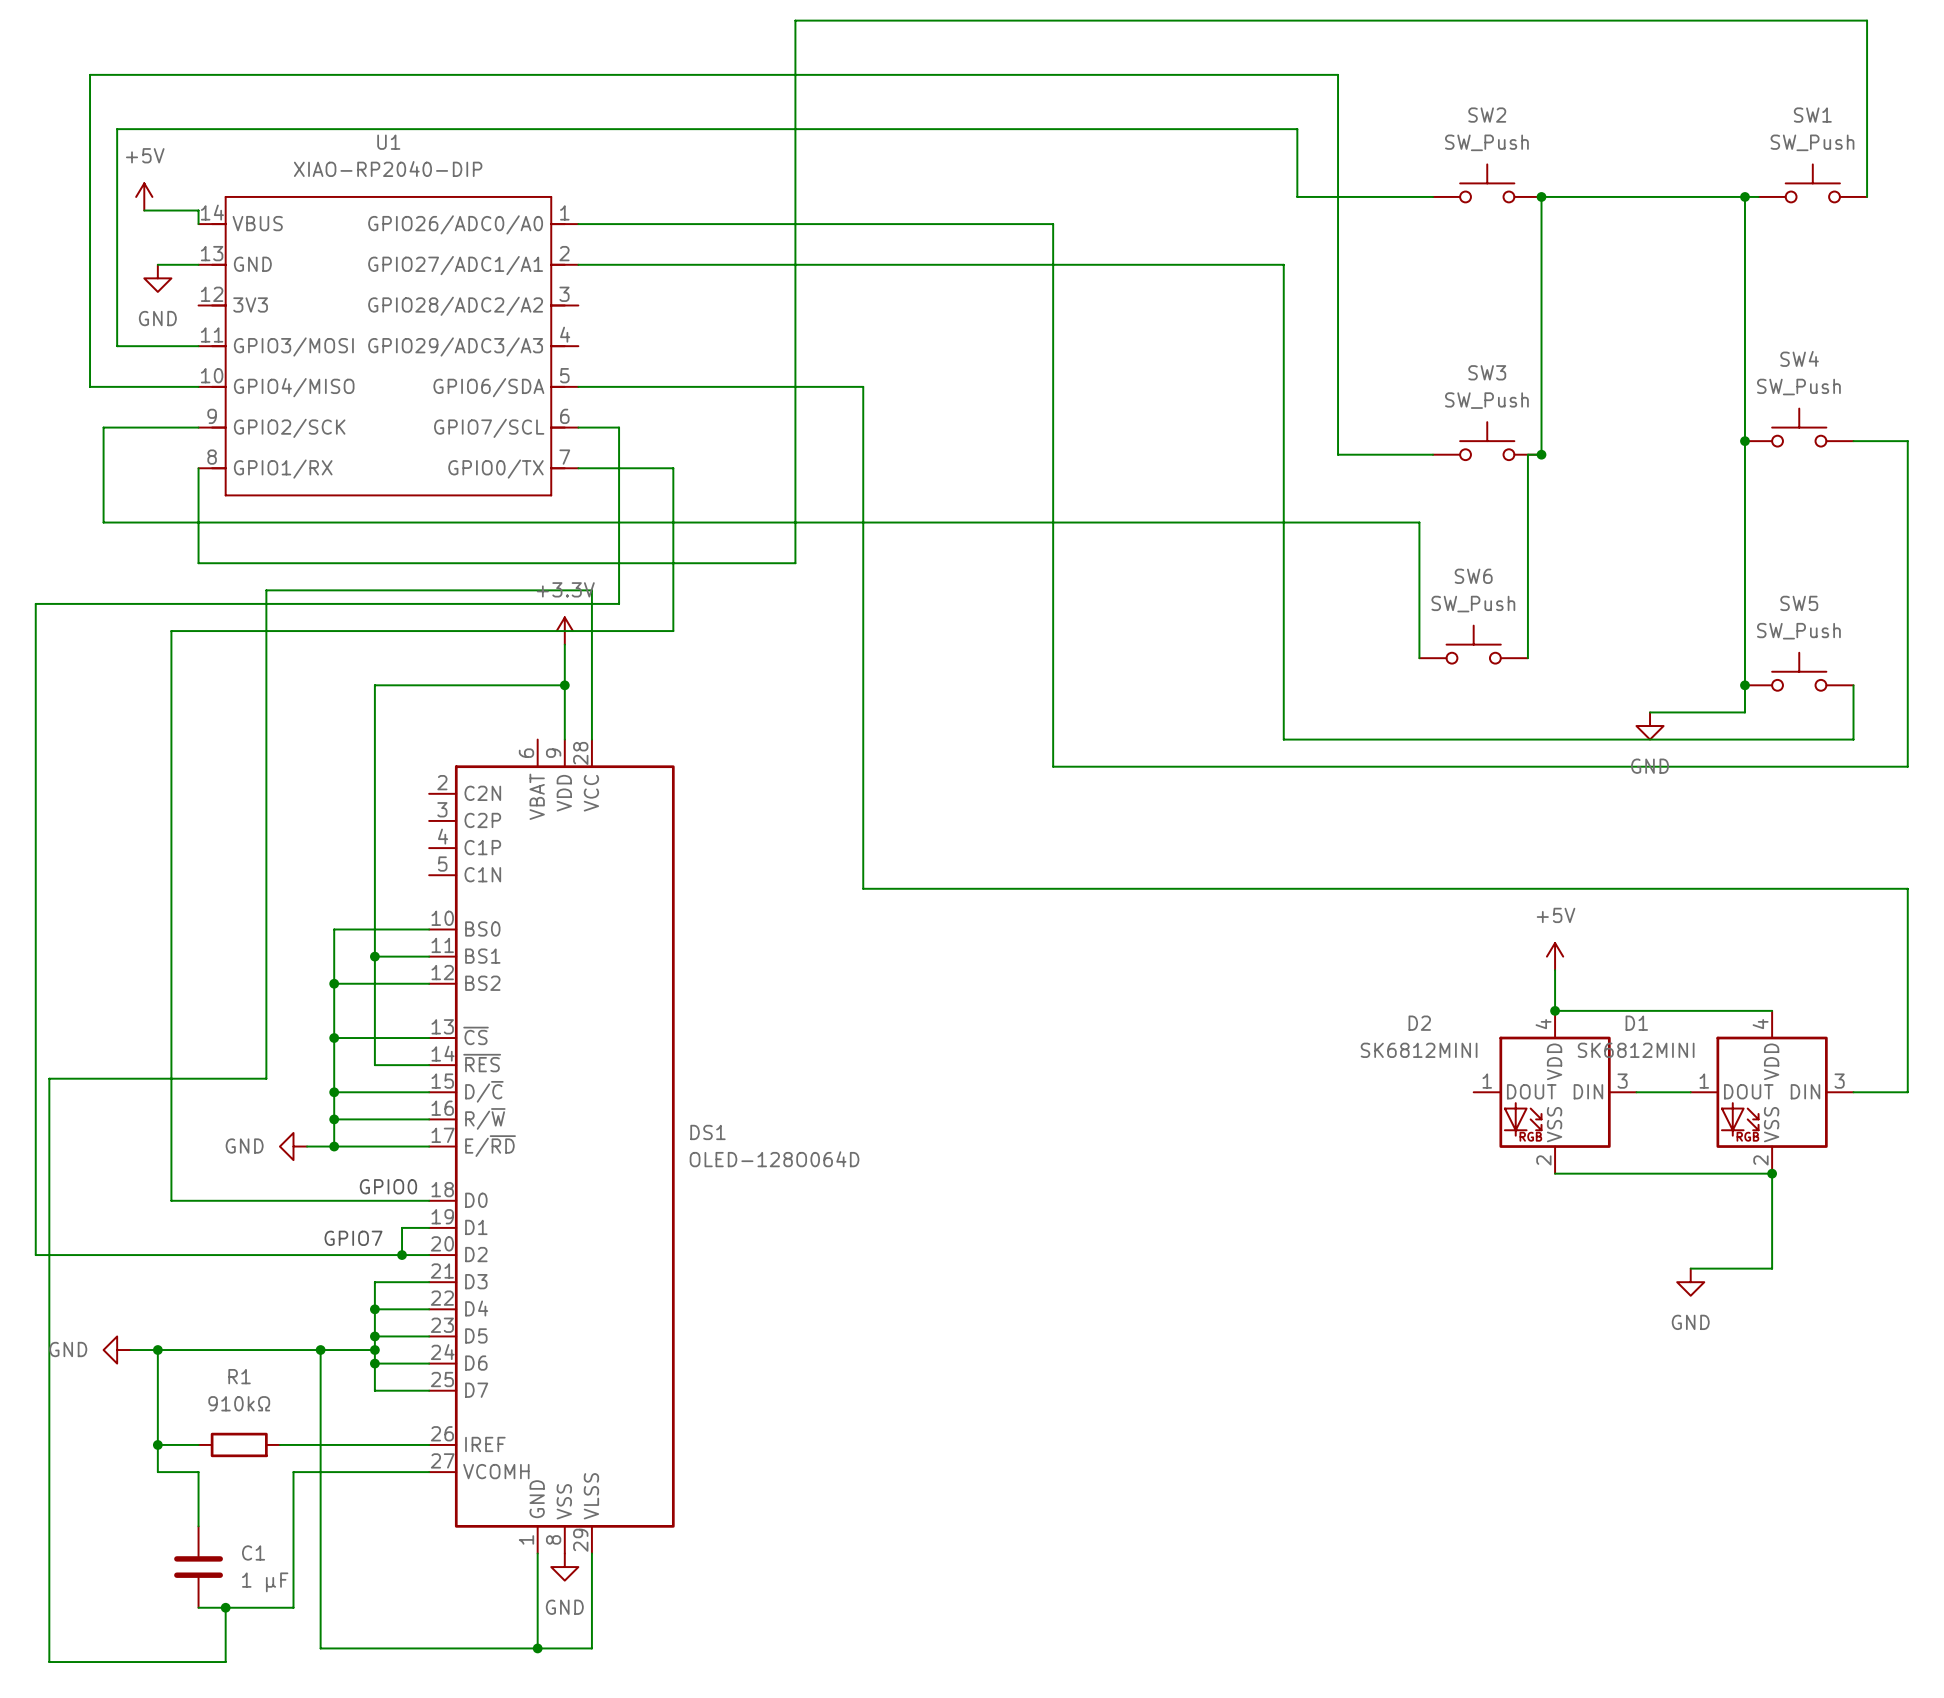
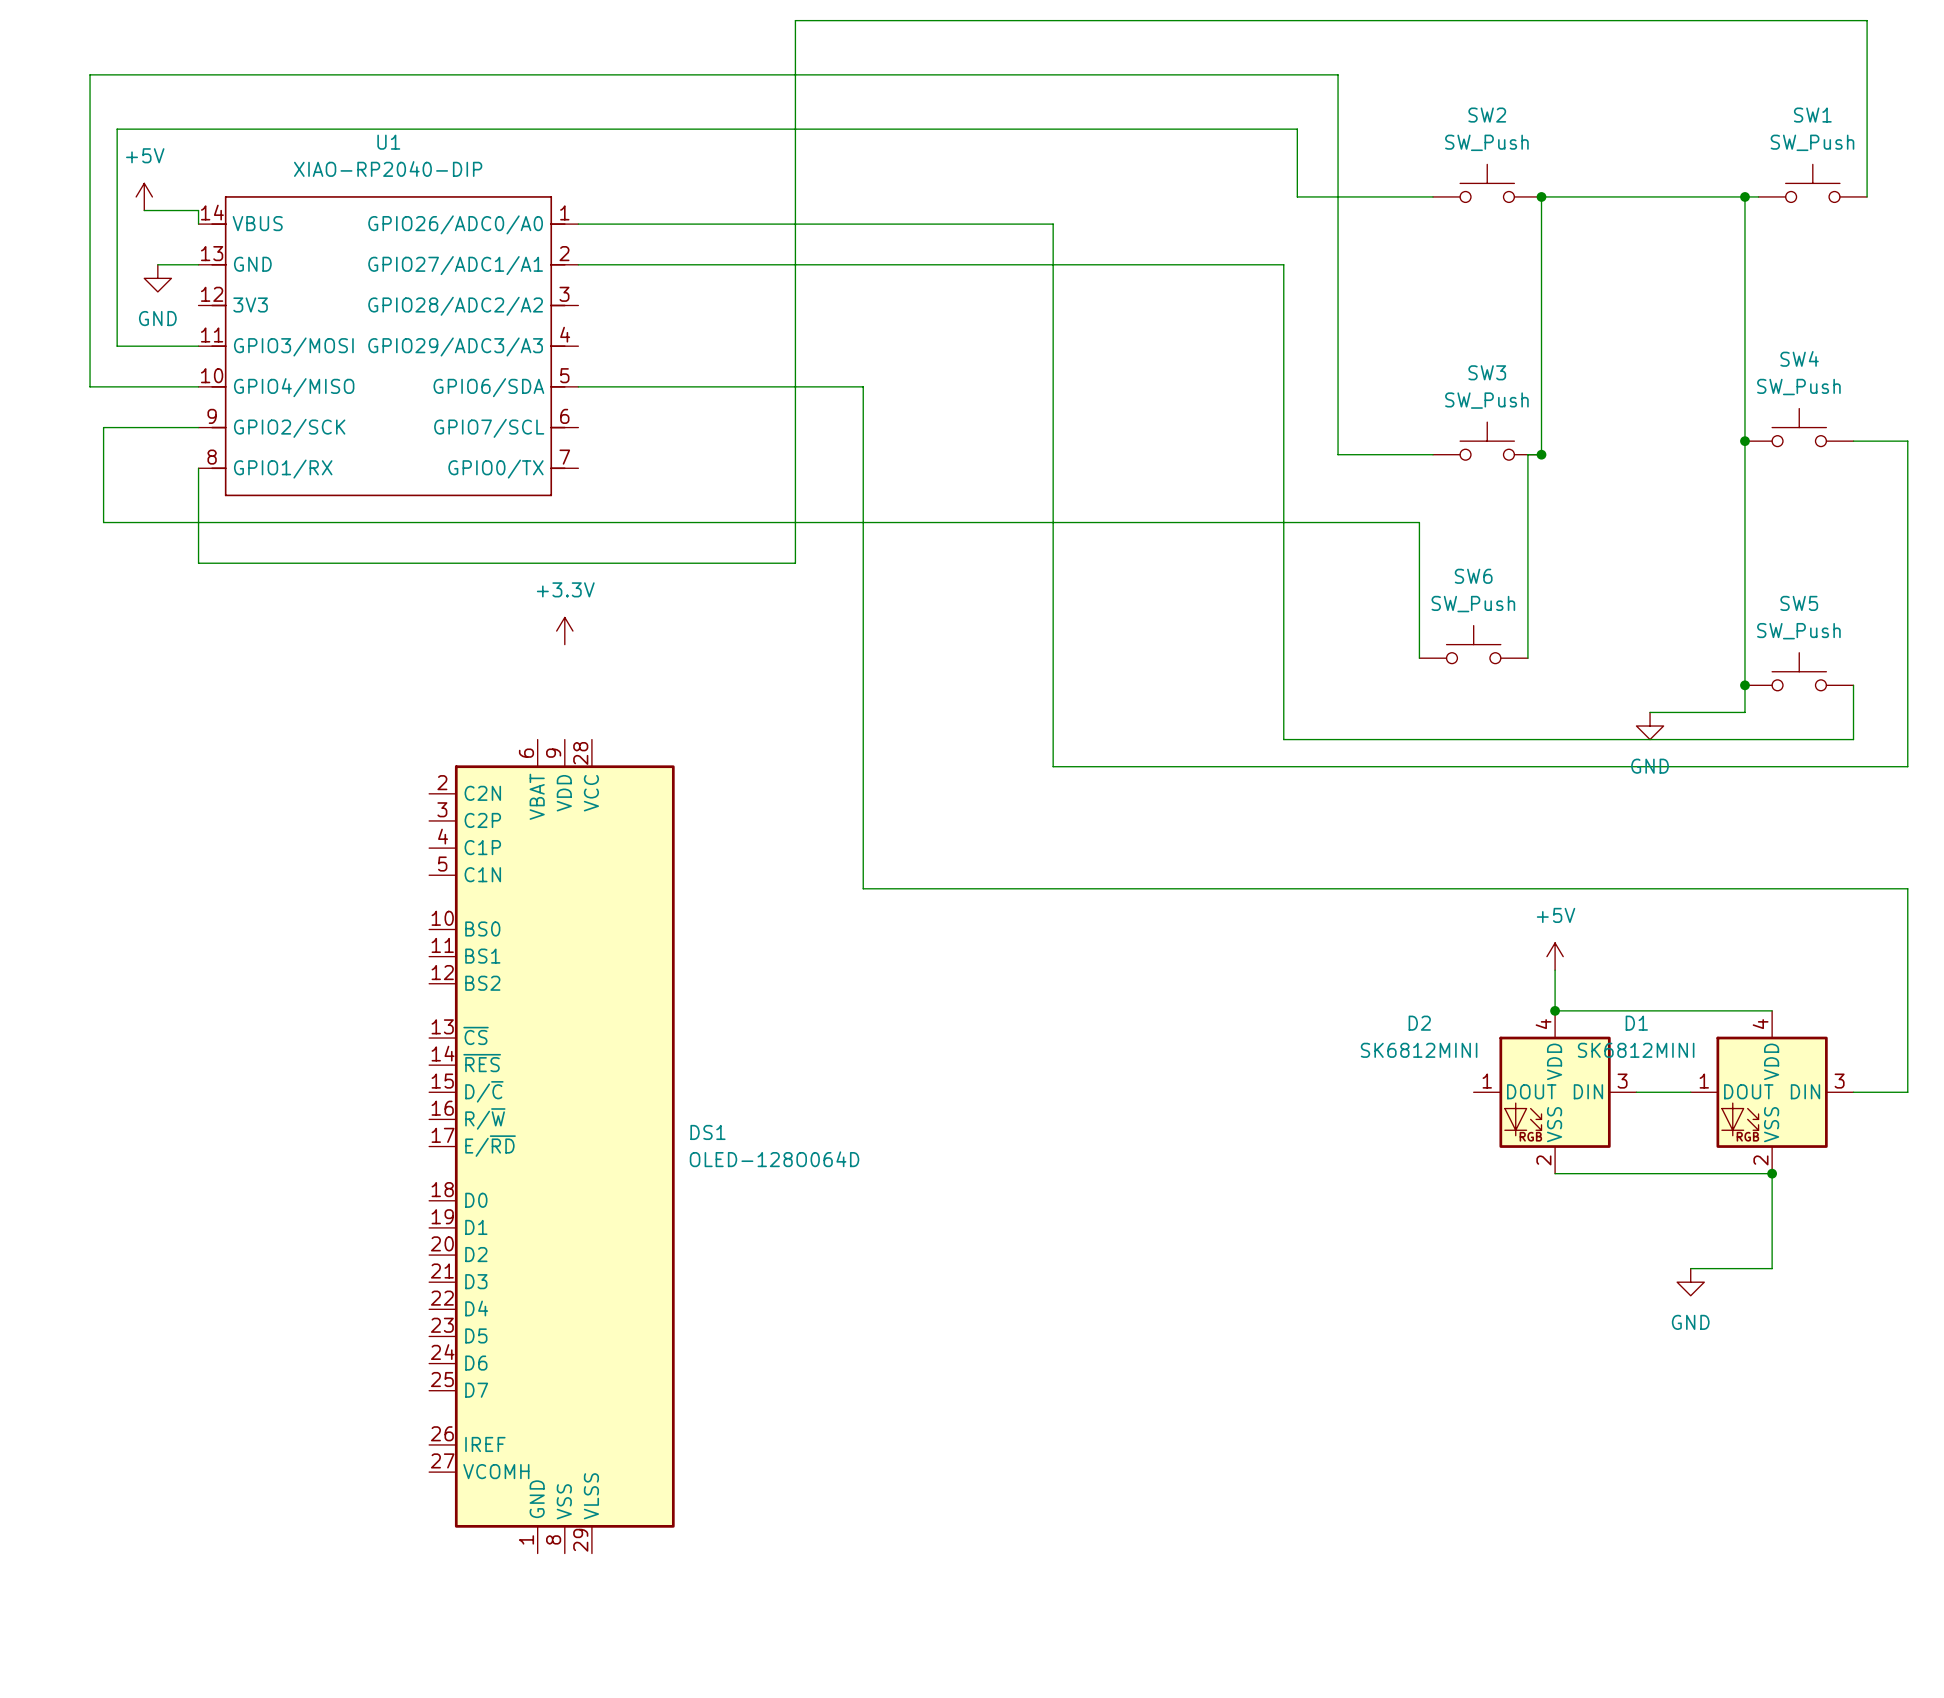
wire: (578, 427) (619, 427) (619, 603) (35, 603) (35, 1255) (429, 1255) -> none
wire: (578, 468) (673, 468) (673, 631) (171, 631) (171, 1200) (429, 1200) -> none
wire: (564, 644) (564, 739) -> none
wire: (564, 685) (374, 685) (374, 1065) (429, 1065) -> none
junction: (564, 685) -> none
wire: (591, 739) (591, 590) (266, 590) (266, 1078) (49, 1078) (49, 1662) (225, 1662) (225, 1607) -> none
wire: (429, 929) (334, 929) (334, 1146) -> none
wire: (374, 956) (429, 956) -> none
junction: (374, 956) -> none
wire: (334, 983) (429, 983) -> none
junction: (334, 983) -> none
wire: (334, 1038) (429, 1038) -> none
junction: (334, 1038) -> none
wire: (334, 1092) (429, 1092) -> none
junction: (334, 1092) -> none
wire: (334, 1119) (429, 1119) -> none
junction: (334, 1119) -> none
power symbol: GND (293, 1146) -> none
wire: (307, 1146) (429, 1146) -> none
junction: (334, 1146) -> none
text: GPIO0 (388, 1186) -> none
wire: (429, 1227) (402, 1227) (402, 1255) -> none
text: GPIO7 (353, 1238) -> none
junction: (402, 1255) -> none
wire: (429, 1282) (374, 1282) (374, 1390) (429, 1390) -> none
wire: (374, 1309) (429, 1309) -> none
junction: (374, 1309) -> none
wire: (374, 1336) (429, 1336) -> none
junction: (374, 1336) -> none
power symbol: GND (117, 1350) -> none
wire: (130, 1350) (374, 1350) -> none
wire: (157, 1350) (157, 1472) (198, 1472) (198, 1526) -> none
junction: (157, 1350) -> none
wire: (320, 1350) (320, 1648) (591, 1648) (591, 1553) -> none
junction: (320, 1350) -> none
junction: (374, 1350) -> none
wire: (374, 1363) (429, 1363) -> none
junction: (374, 1363) -> none
wire: (157, 1444) (198, 1444) -> none
junction: (157, 1444) -> none
R1: 910kΩ (239, 1444) -> none
wire: (279, 1444) (429, 1444) -> none
wire: (429, 1472) (293, 1472) (293, 1607) (198, 1607) -> none
wire: (537, 1553) (537, 1648) -> none
C1: 1 µF (198, 1567) -> none
power symbol: GND (564, 1567) -> none
junction: (225, 1607) -> none
junction: (537, 1648) -> none

